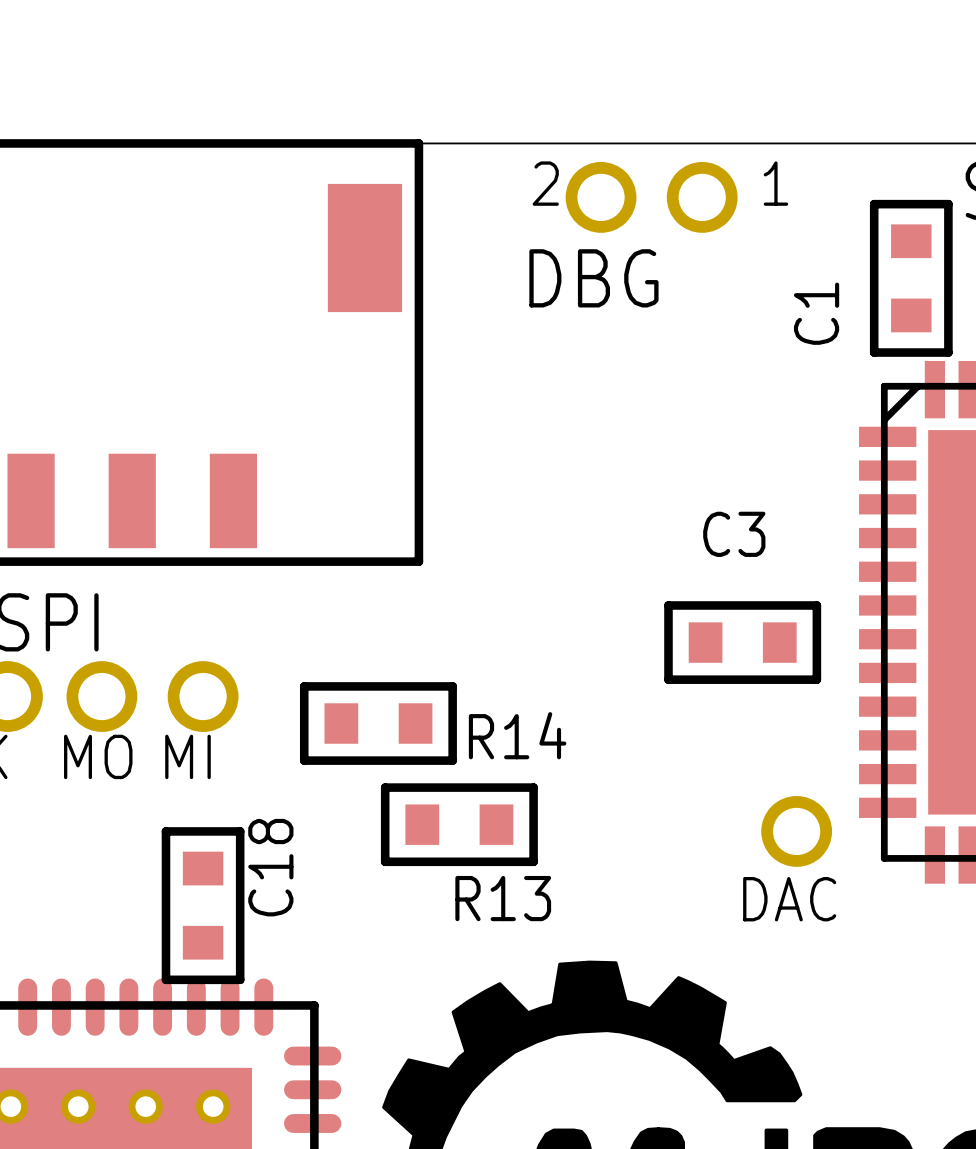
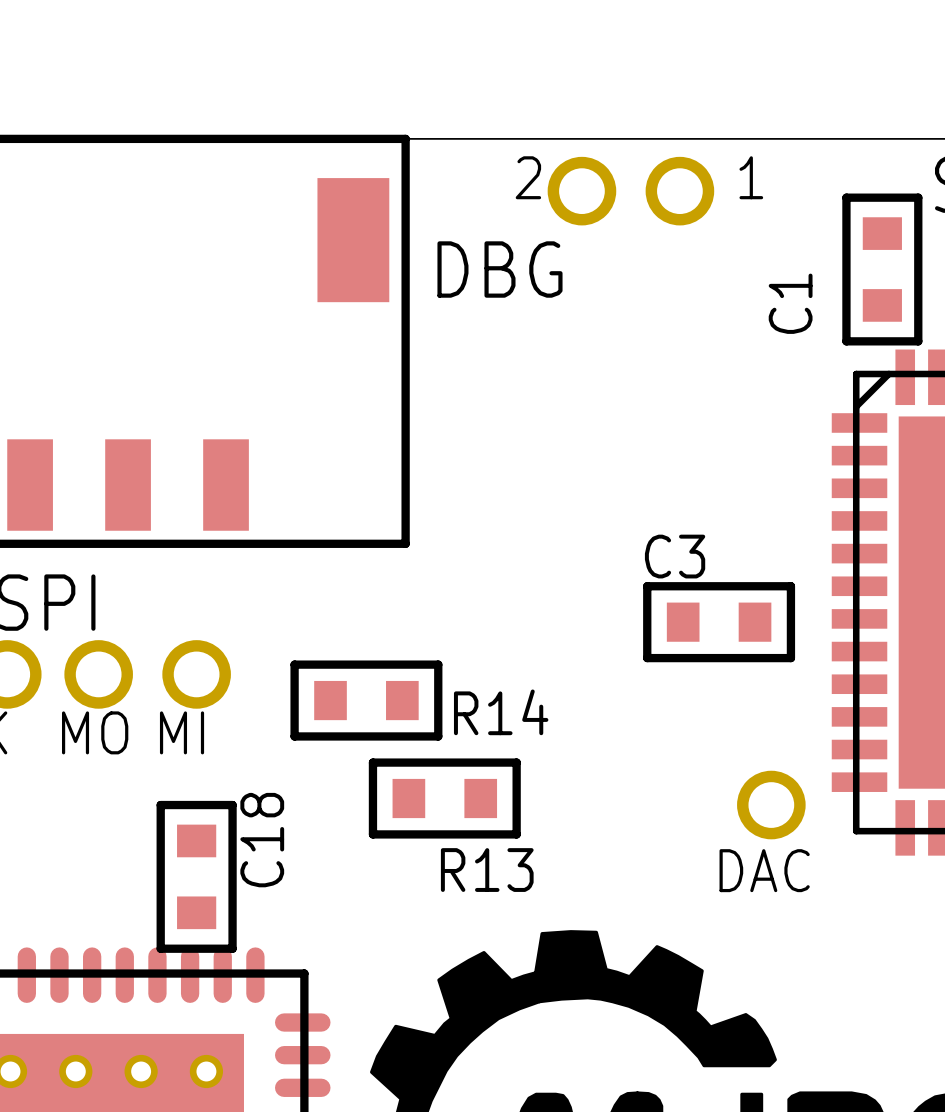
text position: DBG (593, 278) -> DBG (499, 269)
C3 name position: C3 (734, 534) -> C3 (675, 556)

